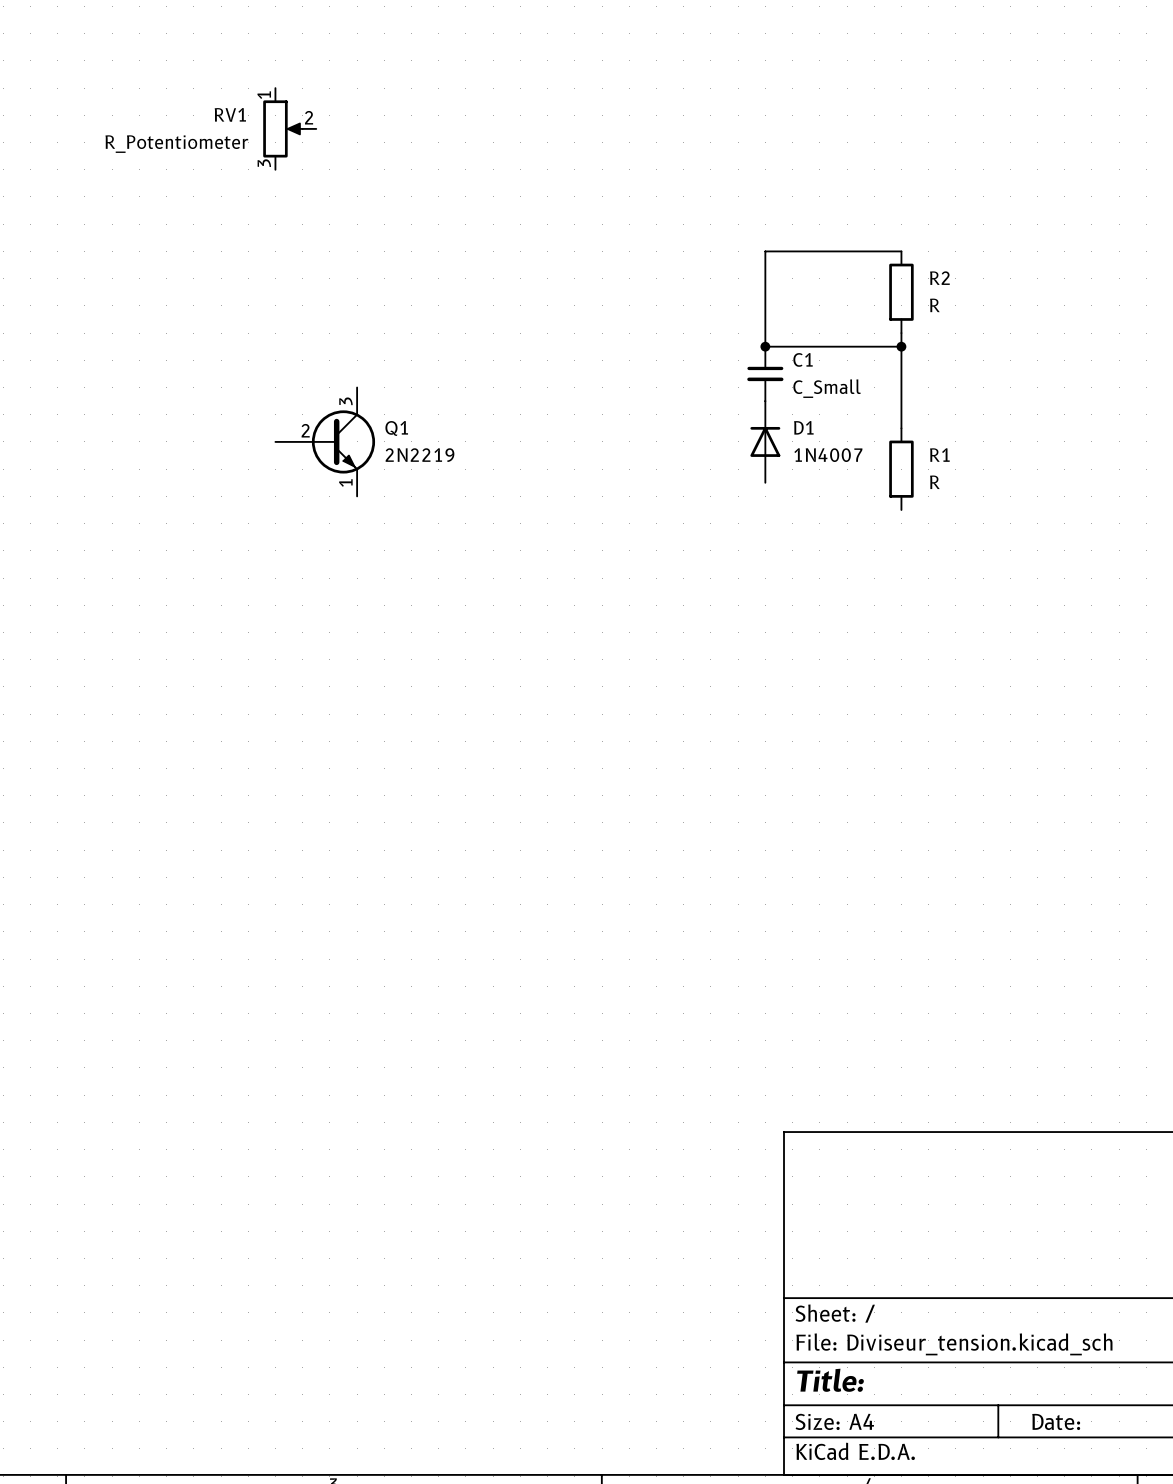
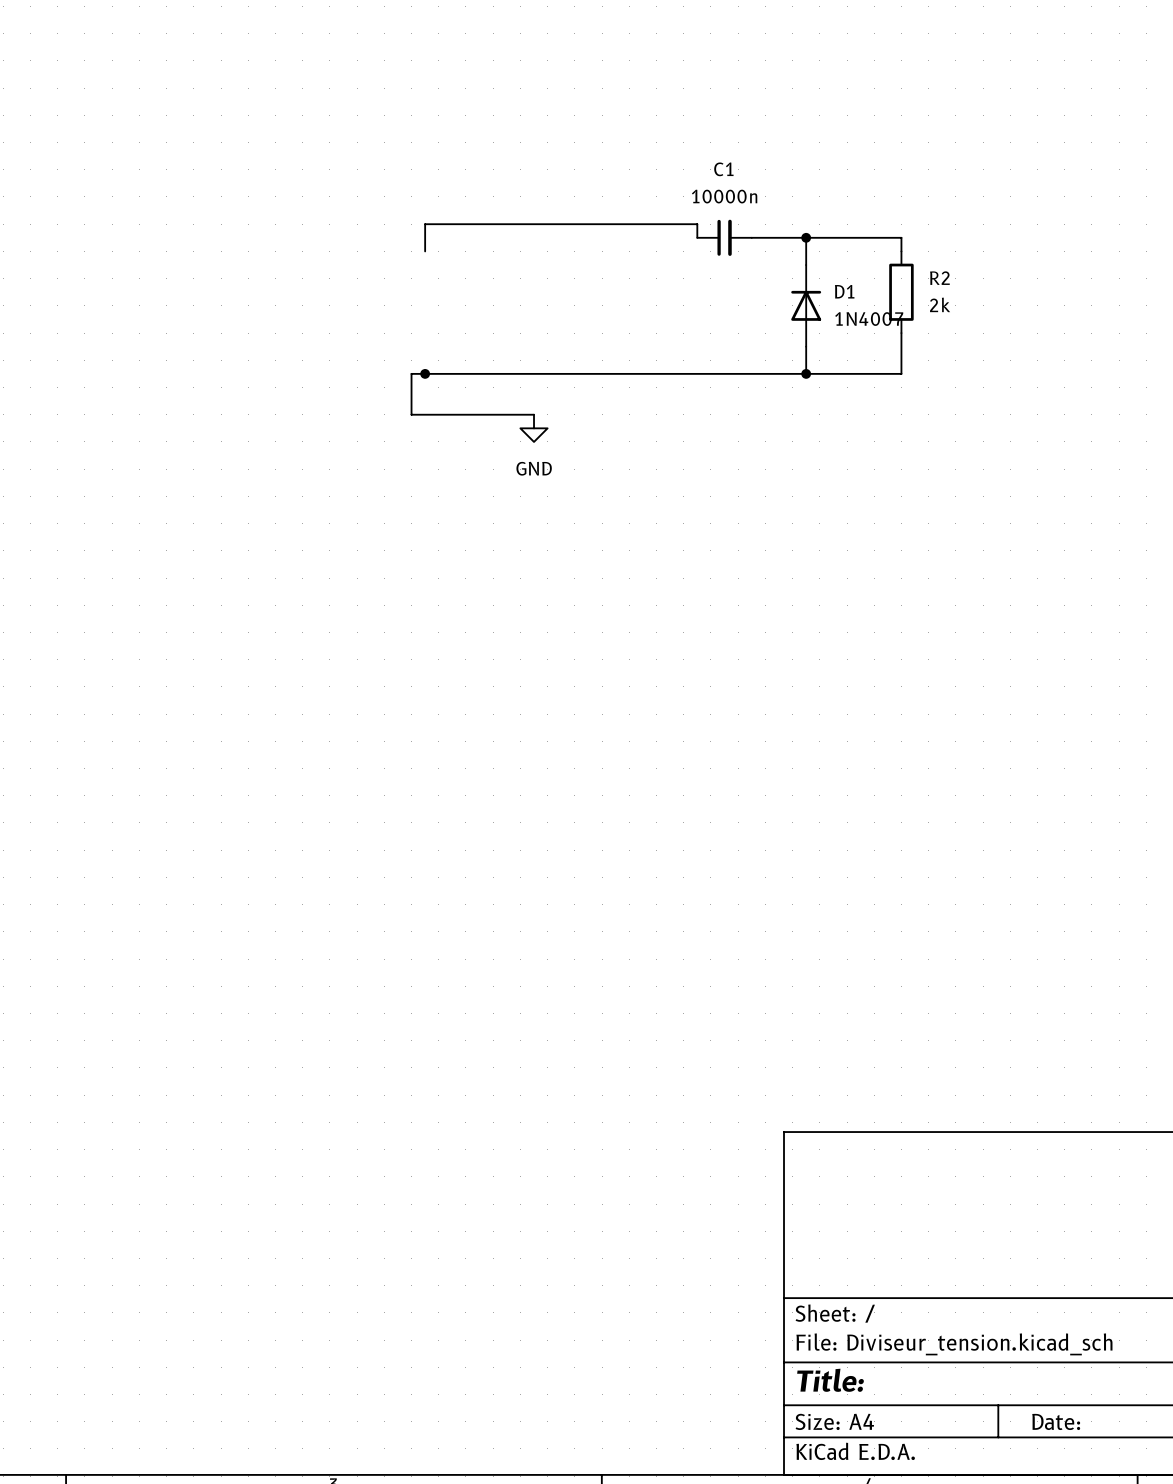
RV1: R_Potentiometer (289, 128) -> none
wire: none -> (697, 237) (697, 224) (425, 224) (425, 251)
wire: none -> (806, 237) (806, 265)
junction: none -> (806, 237)
wire: (901, 251) (765, 251) (765, 346) (901, 346) -> (901, 251) (901, 237) (751, 237)
R2 value: R (934, 305) -> 2k (940, 304)
junction position: (765, 346) -> (806, 373)
wire: none -> (806, 346) (806, 373)
junction: (901, 346) -> none
C1 name position: C1 (803, 359) -> C1 (723, 169)
junction: none -> (425, 373)
C1 rotation: 0° (765, 373) -> 90° counterclockwise (724, 237)
C1 position: (765, 373) -> (724, 237)
wire: (901, 373) (901, 428) -> (901, 373) (411, 373) (411, 414) (534, 414)
C1 value: C_Small (827, 388) -> 10000n (724, 196)
power symbol: none -> GND (534, 428)
Q1: 2N2219 (325, 441) -> none
D1 position: (765, 441) -> (806, 305)
R1: R (901, 469) -> none

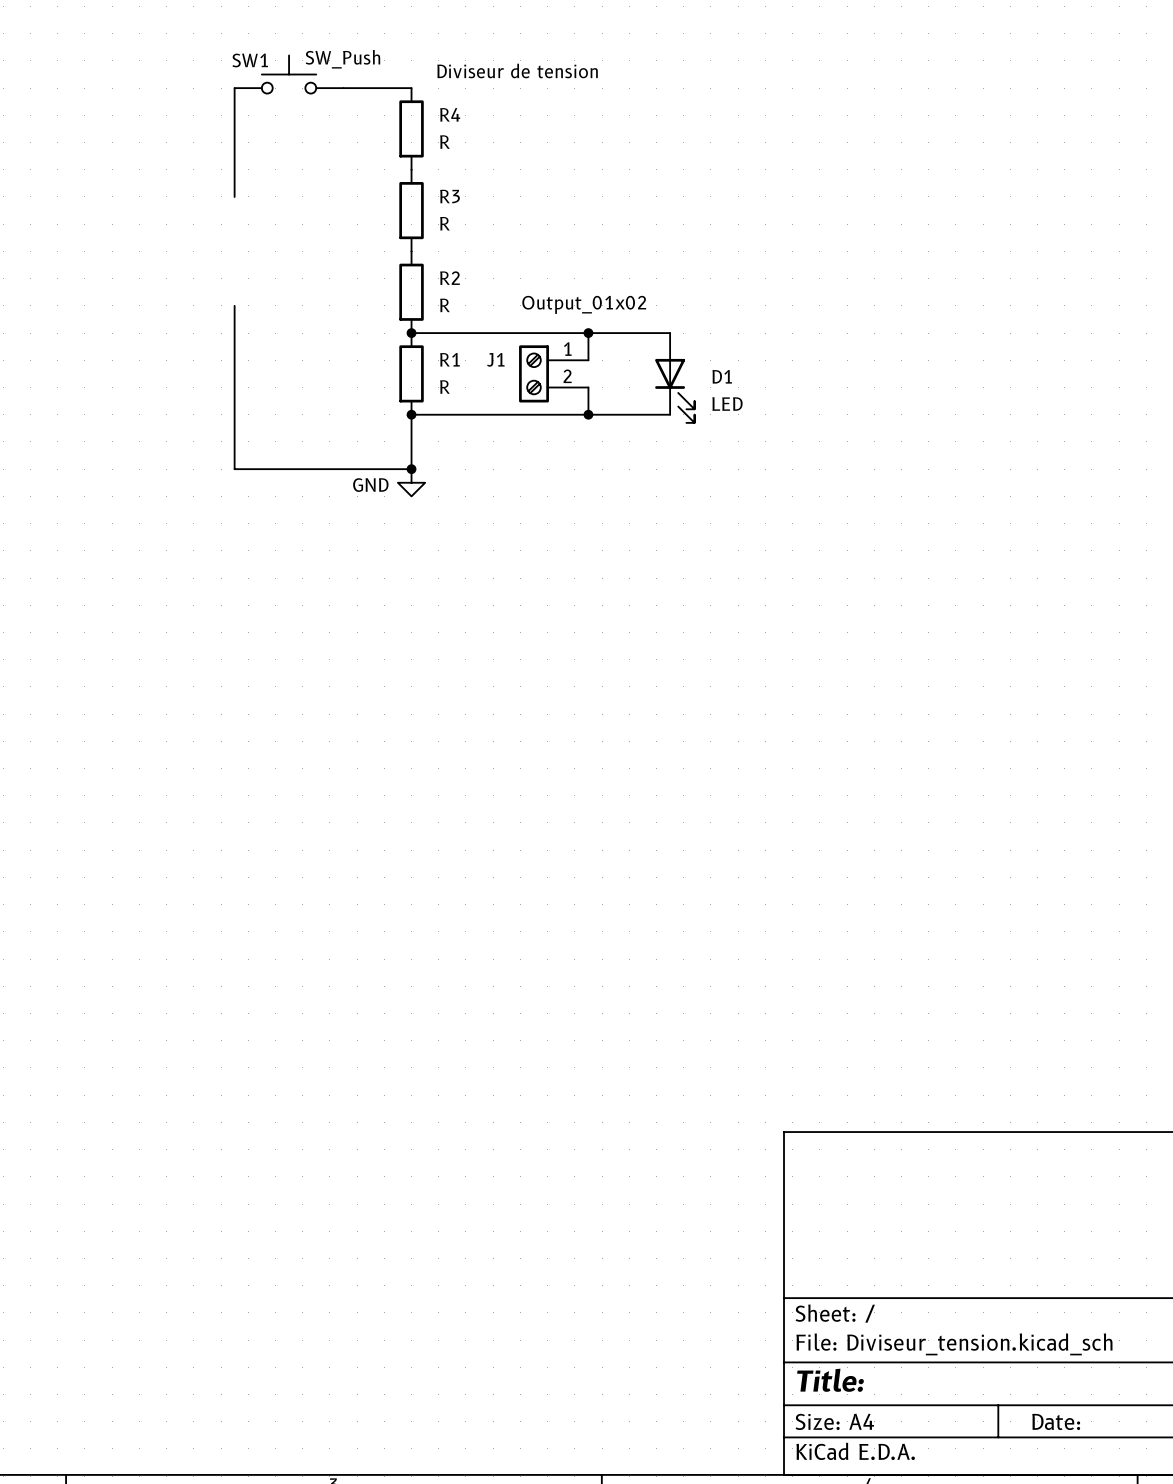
text: none -> Diviseur de tension (517, 70)
SW1: none -> SW_Push (289, 74)
wire: none -> (234, 88) (234, 196)
wire: none -> (343, 88) (411, 88)
R4: none -> R (411, 128)
R3: none -> R (411, 210)
wire: (697, 237) (697, 224) (425, 224) (425, 251) -> none
C1: 10000n (724, 237) -> none
wire: (751, 237) (901, 237) (901, 251) -> none
wire: (806, 237) (806, 265) -> (588, 387) (588, 414)
junction: (806, 237) -> none
D1 symbol: [791, 265, 822, 347] -> [655, 333, 695, 423]
R2 position: (901, 292) -> (411, 292)
R2 value: 2k (940, 304) -> R (444, 305)
D1 value: 1N4007 (869, 319) -> LED (727, 404)
wire: none -> (411, 333) (670, 333)
junction: none -> (411, 333)
junction: none -> (588, 333)
wire: (901, 333) (901, 373) (411, 373) (411, 414) -> (234, 305) (234, 469) (411, 469) (411, 414)
wire: (806, 346) (806, 373) -> (588, 333) (588, 360)
R1: none -> R (411, 373)
junction: (425, 373) -> none
J1: none -> Output_01x02 (553, 373)
junction: (806, 373) -> none
junction: none -> (411, 414)
wire: none -> (534, 414) (670, 414)
junction: none -> (588, 414)
power symbol position: GND (534, 428) -> GND (411, 482)
power symbol text position: GND (534, 468) -> GND (370, 485)
junction: none -> (411, 469)

